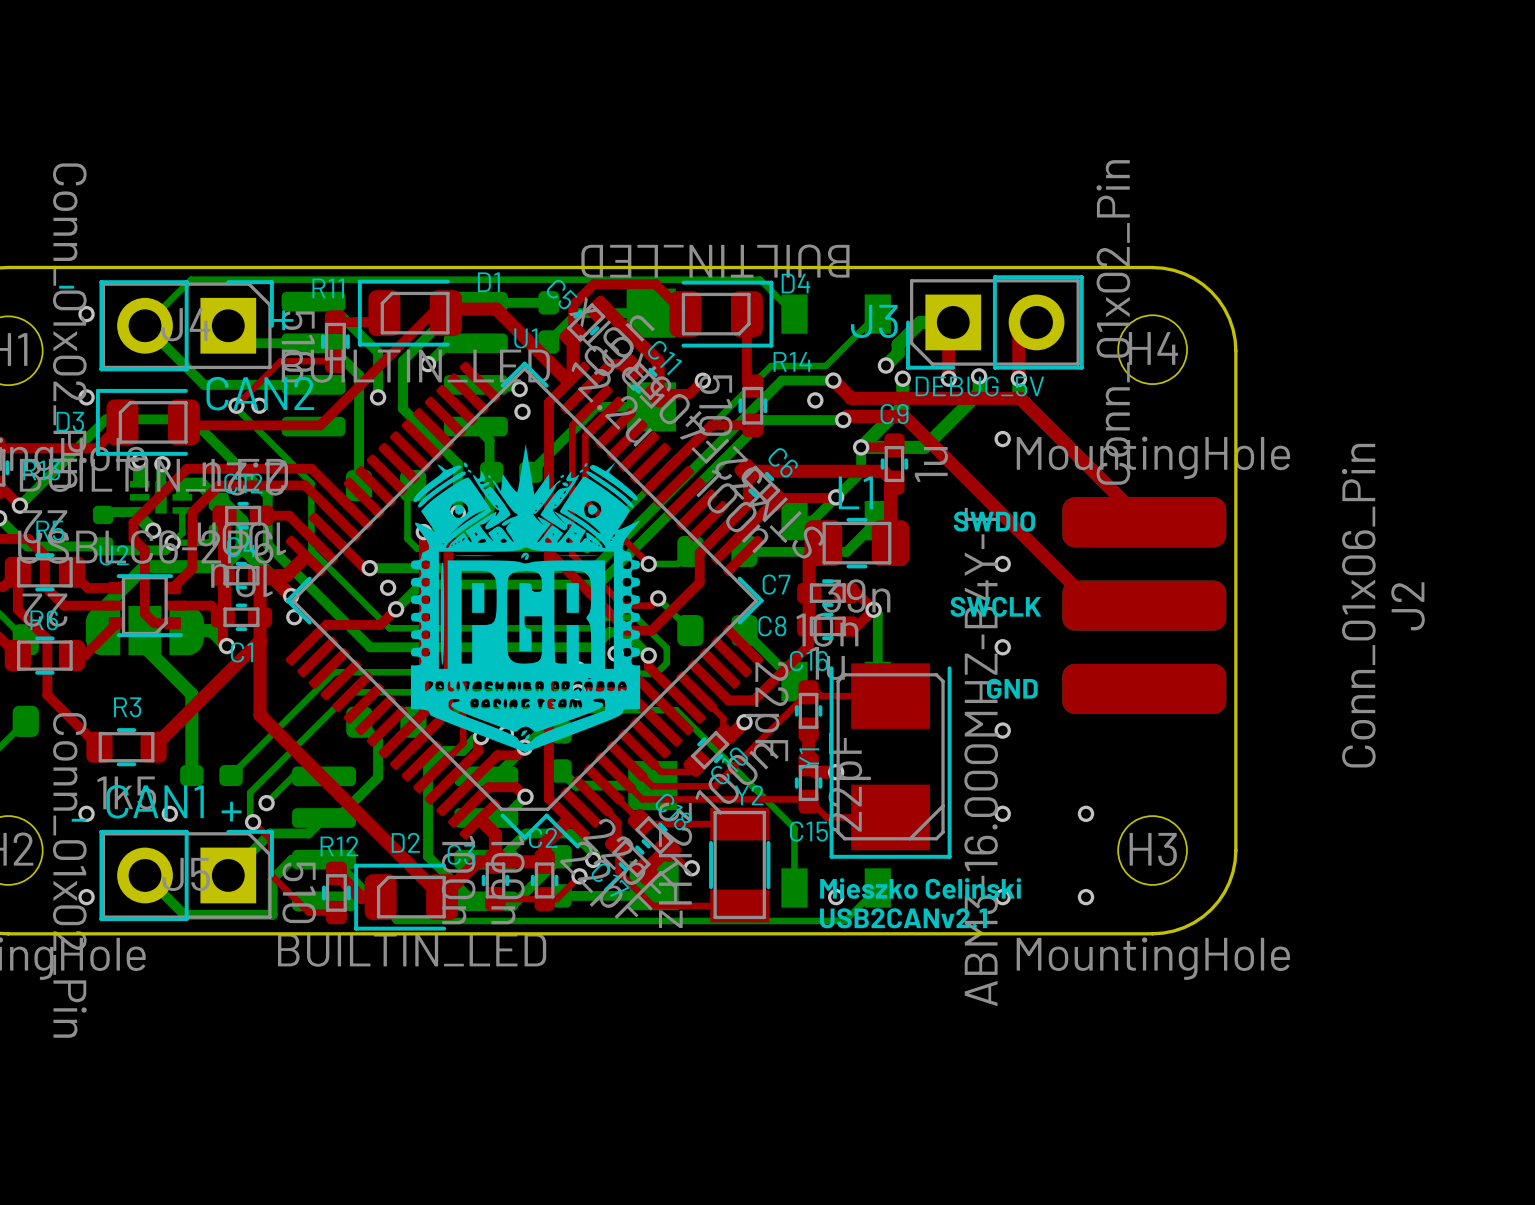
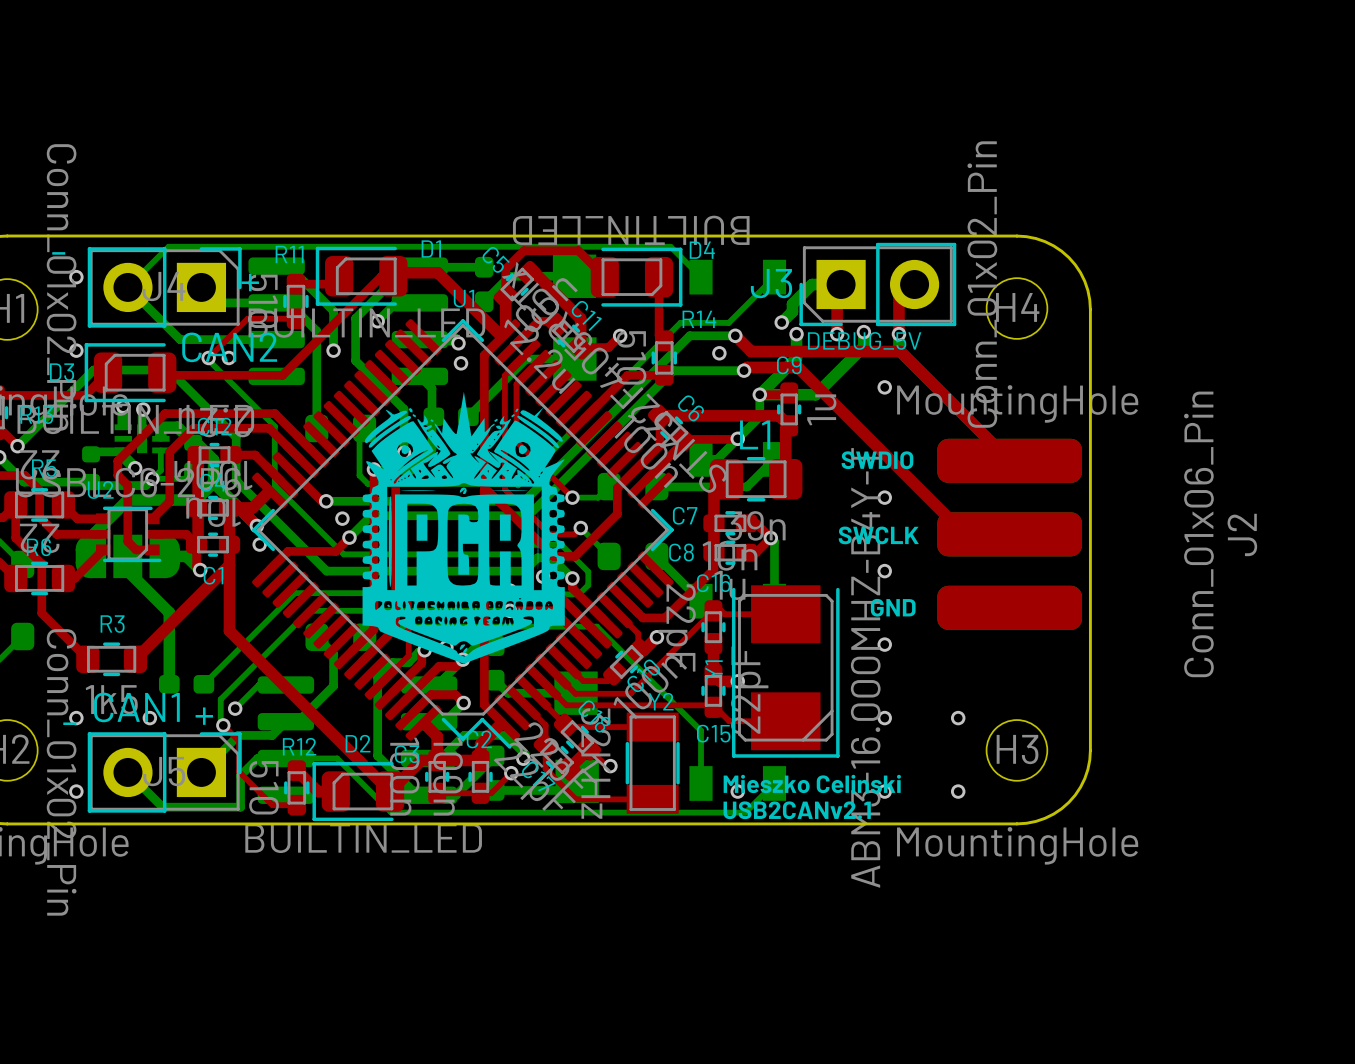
bottom track: (335, 859) (396, 920) (443, 920) -> (295, 758) (337, 758) (391, 812)

